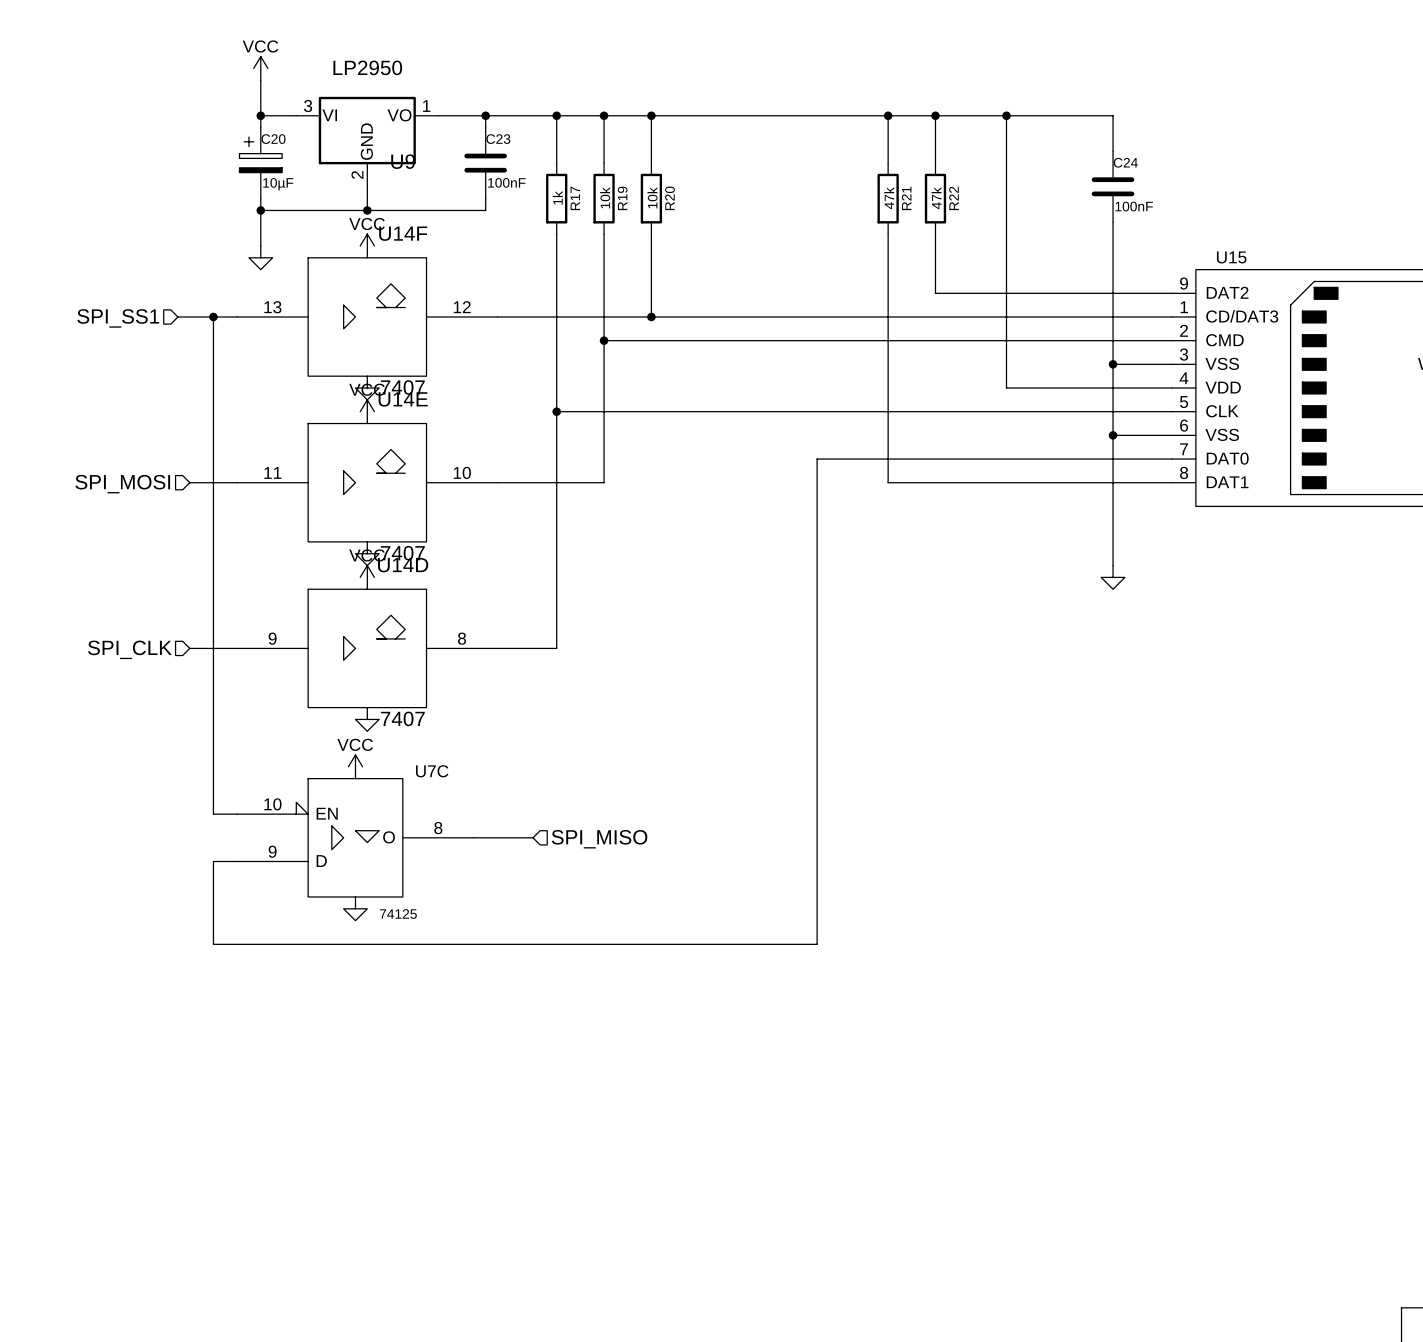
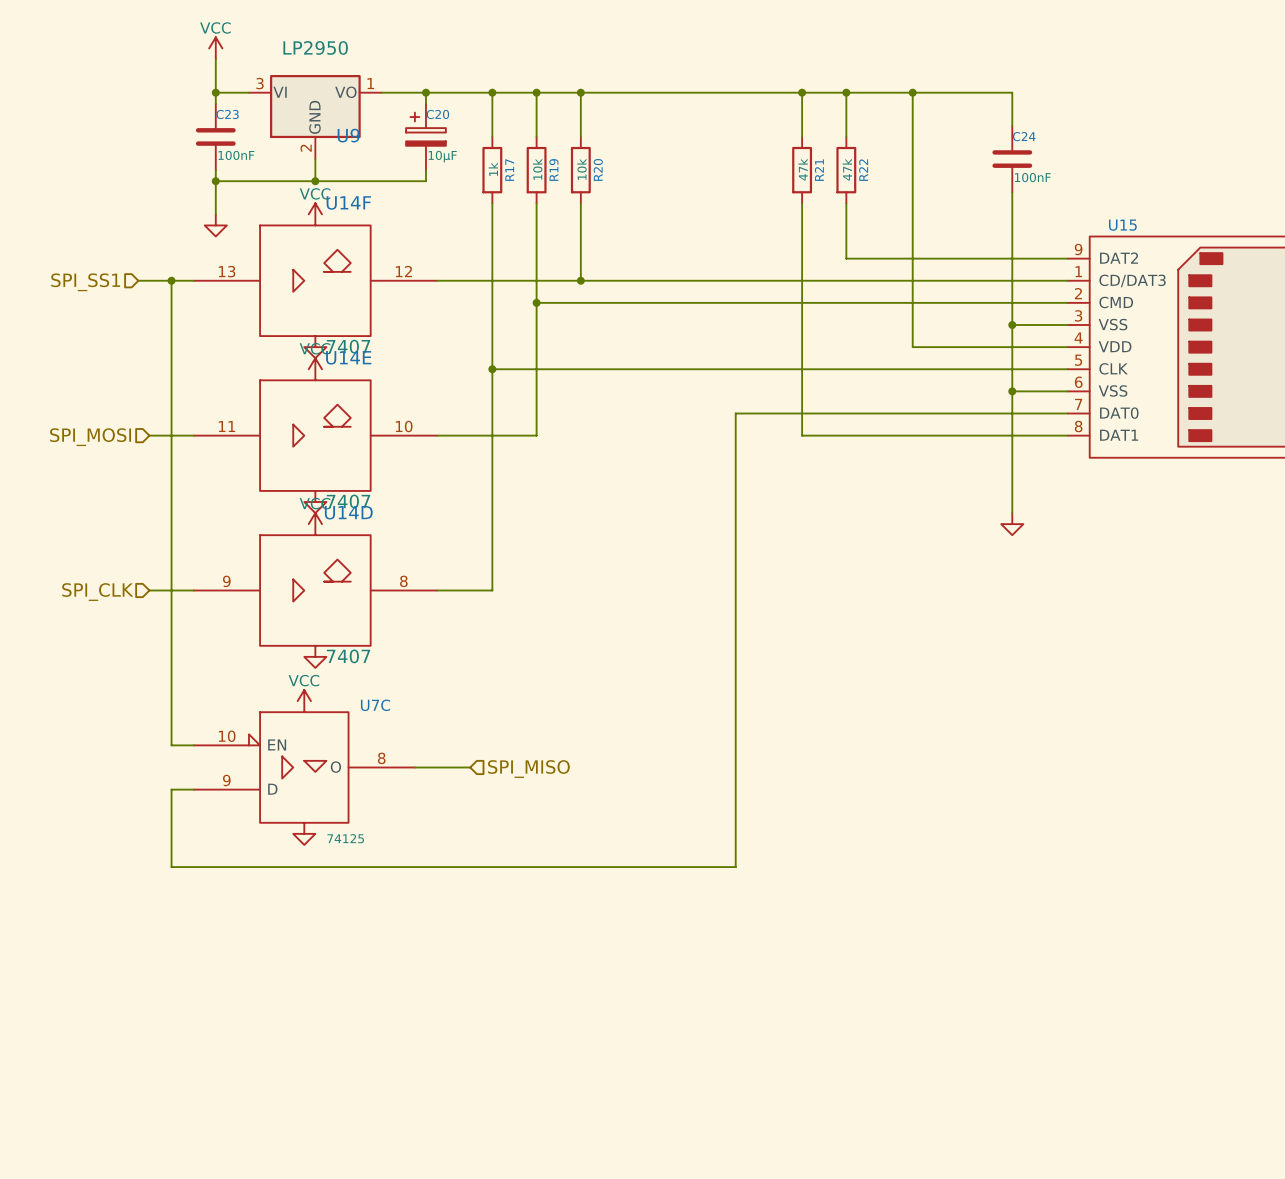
C20 position: (260, 163) -> (425, 136)
C23 position: (485, 163) -> (215, 136)

